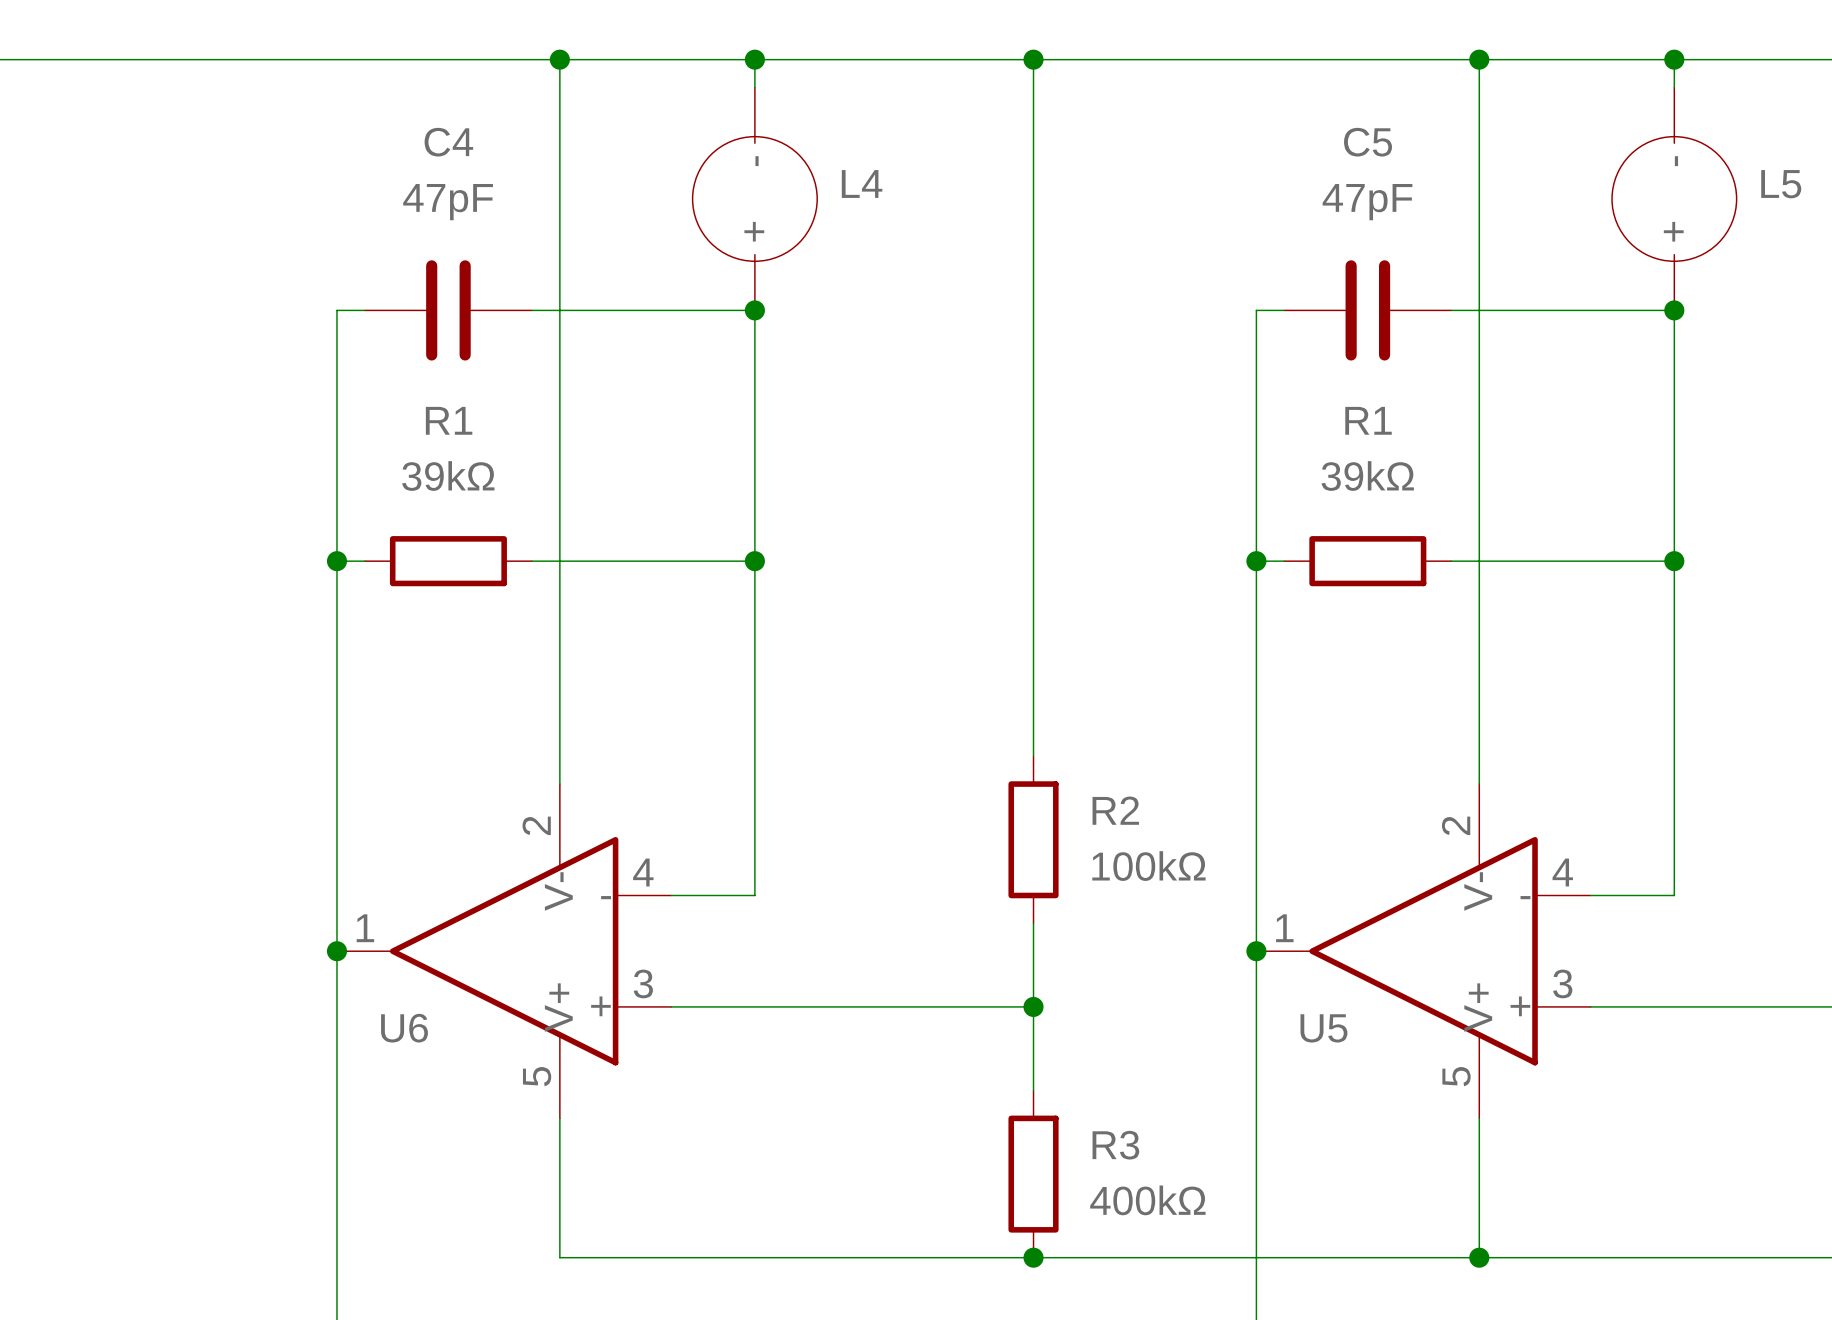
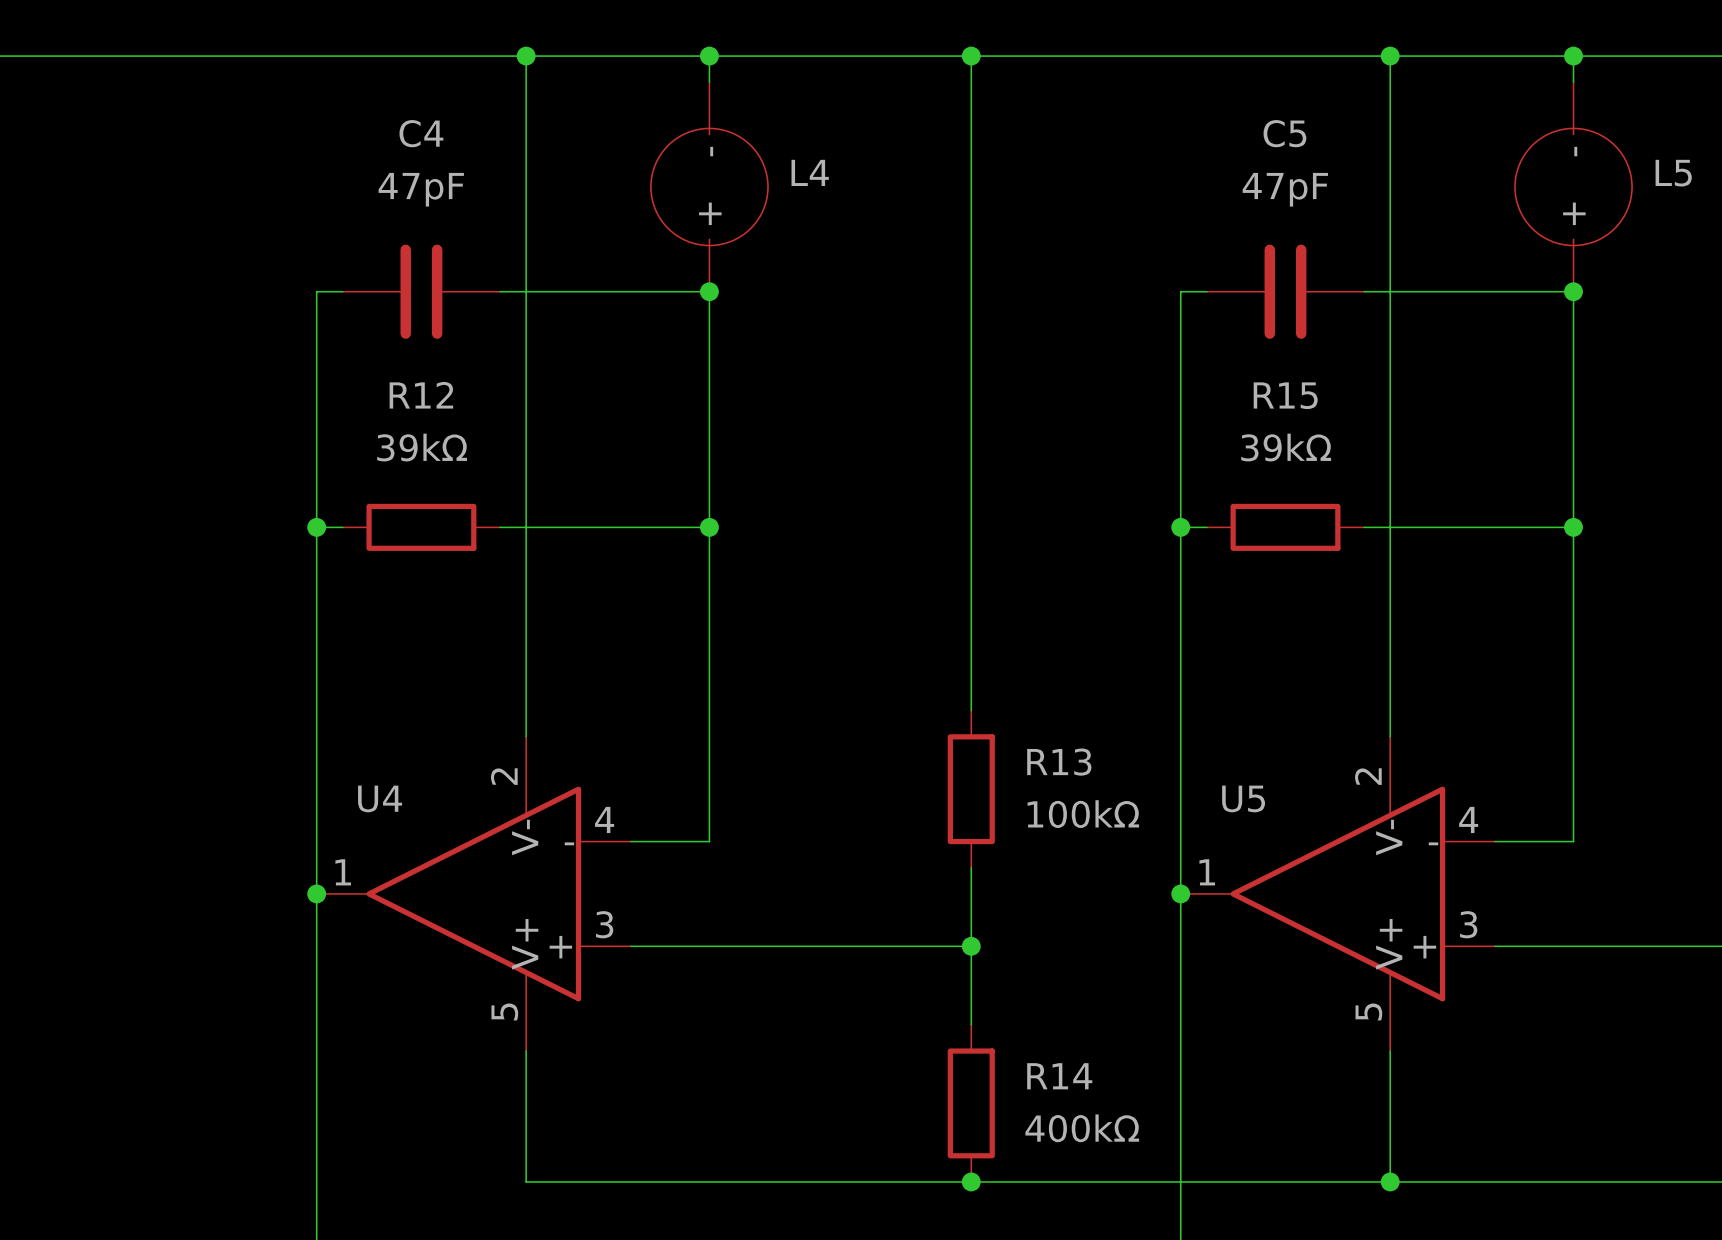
R1 name: R1 (449, 420) -> R12 (421, 395)
R1 name: R1 (1368, 420) -> R15 (1285, 395)
R2 name: R2 (1115, 810) -> R13 (1059, 762)
U6 name: U6 (404, 1028) -> U4 (380, 798)
U5 name position: U5 (1323, 1028) -> U5 (1243, 798)
R3 name: R3 (1115, 1145) -> R14 (1059, 1076)

